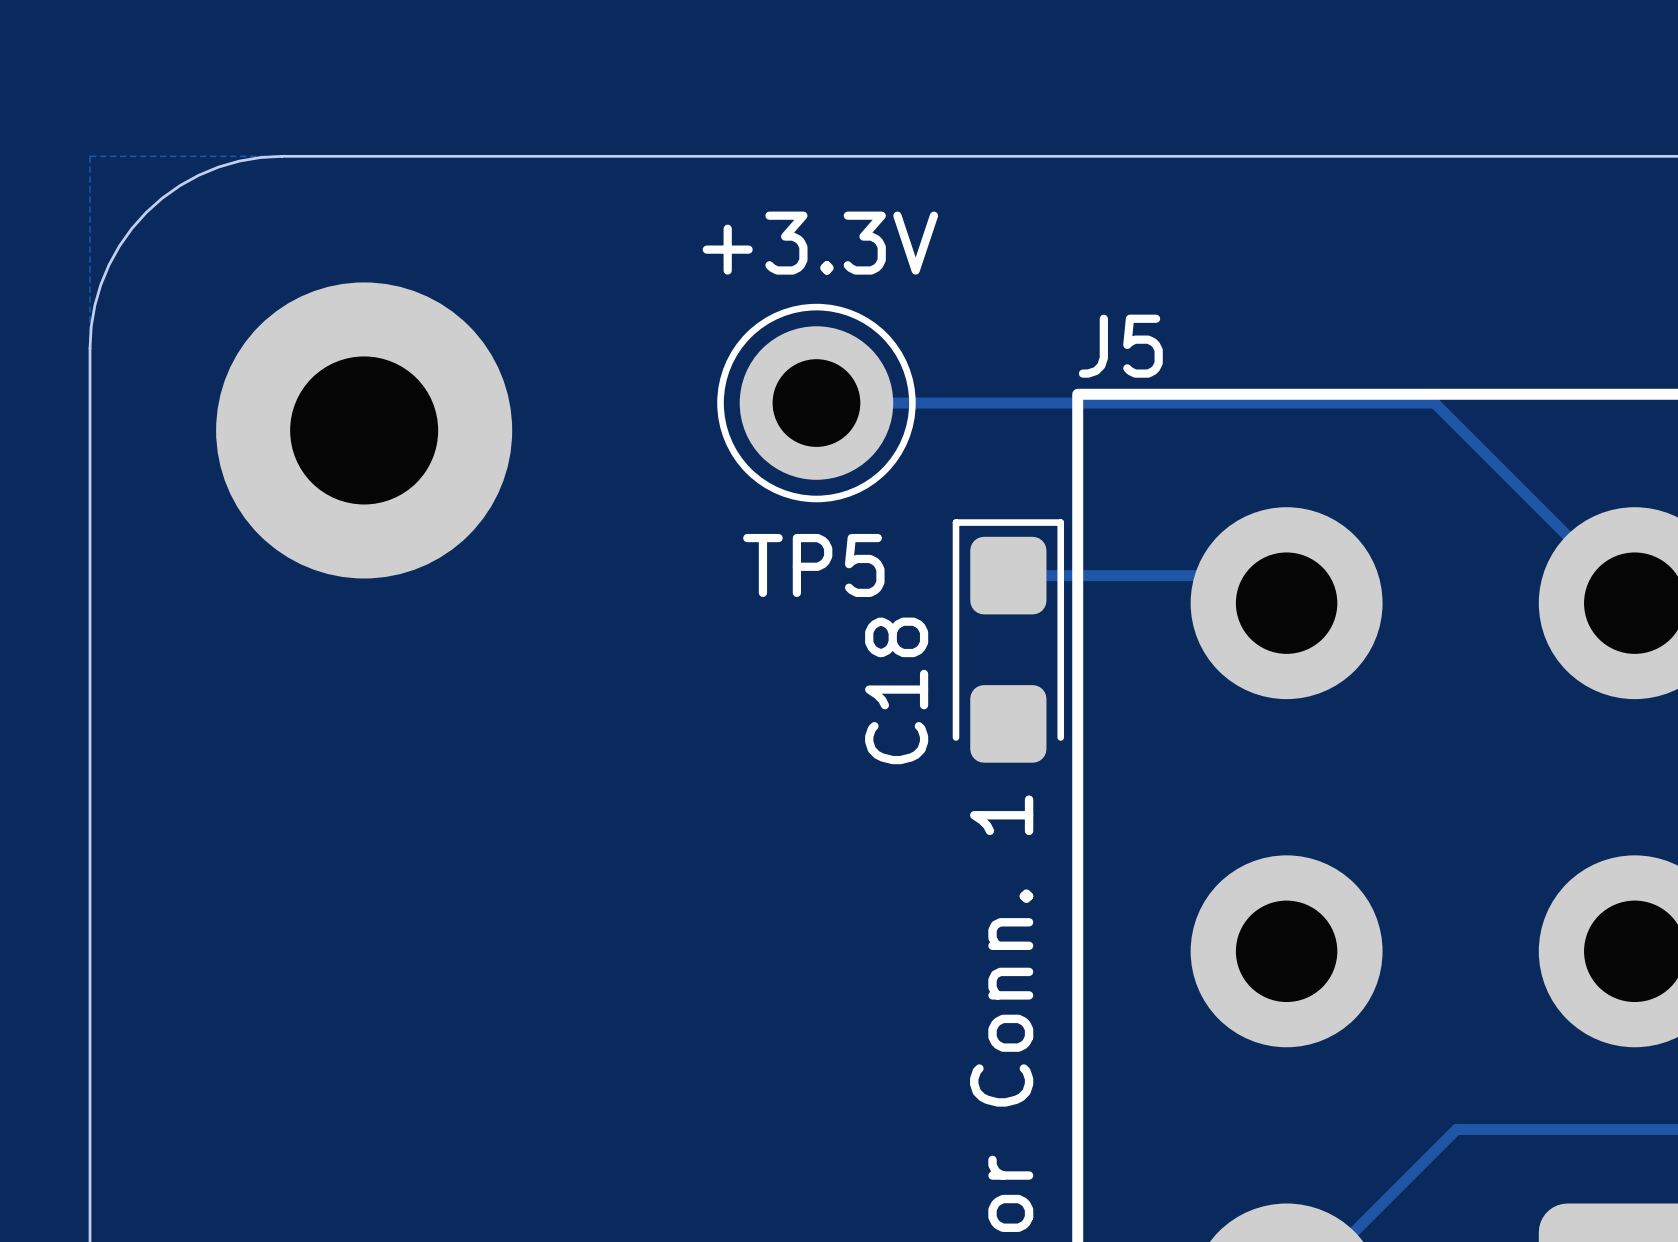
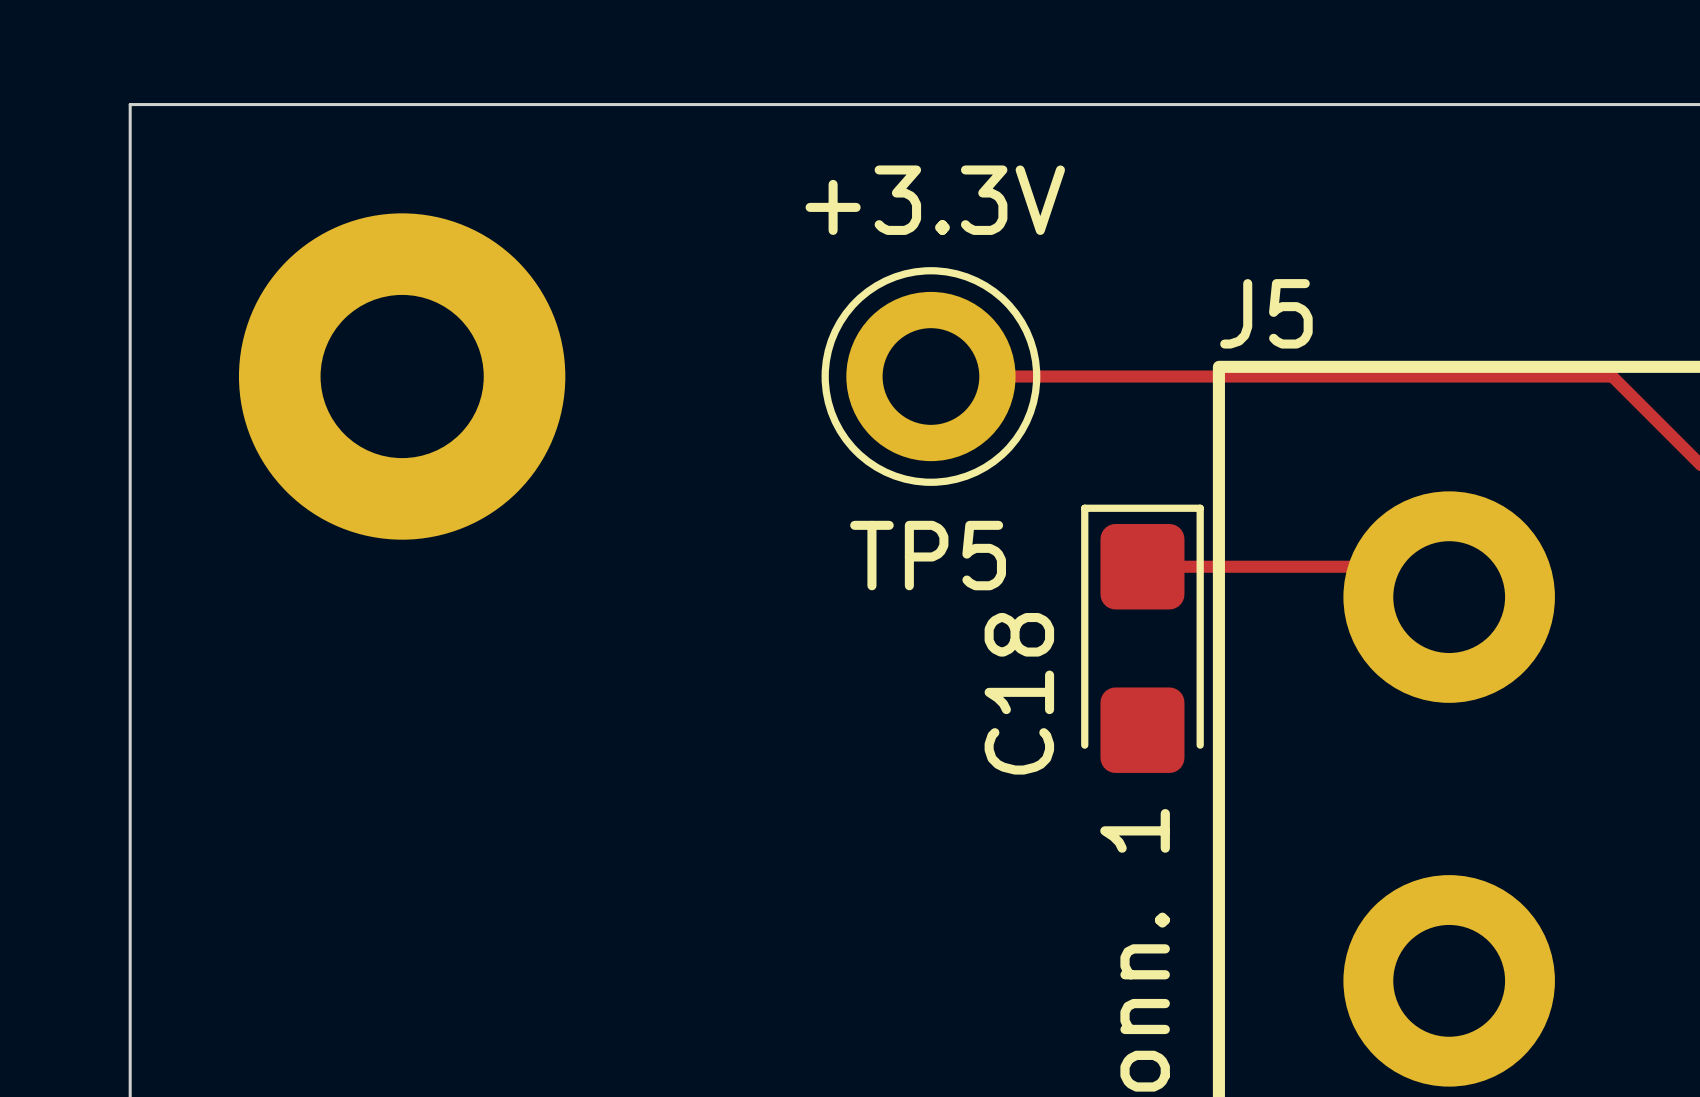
board edge: (281, 156) (260, 157) (218, 167) (179, 185) (146, 212) (119, 246) (100, 284) (91, 326) (90, 348) -> (341, 104) (130, 104) (130, 316)
part position: (364, 430) -> (402, 376)

